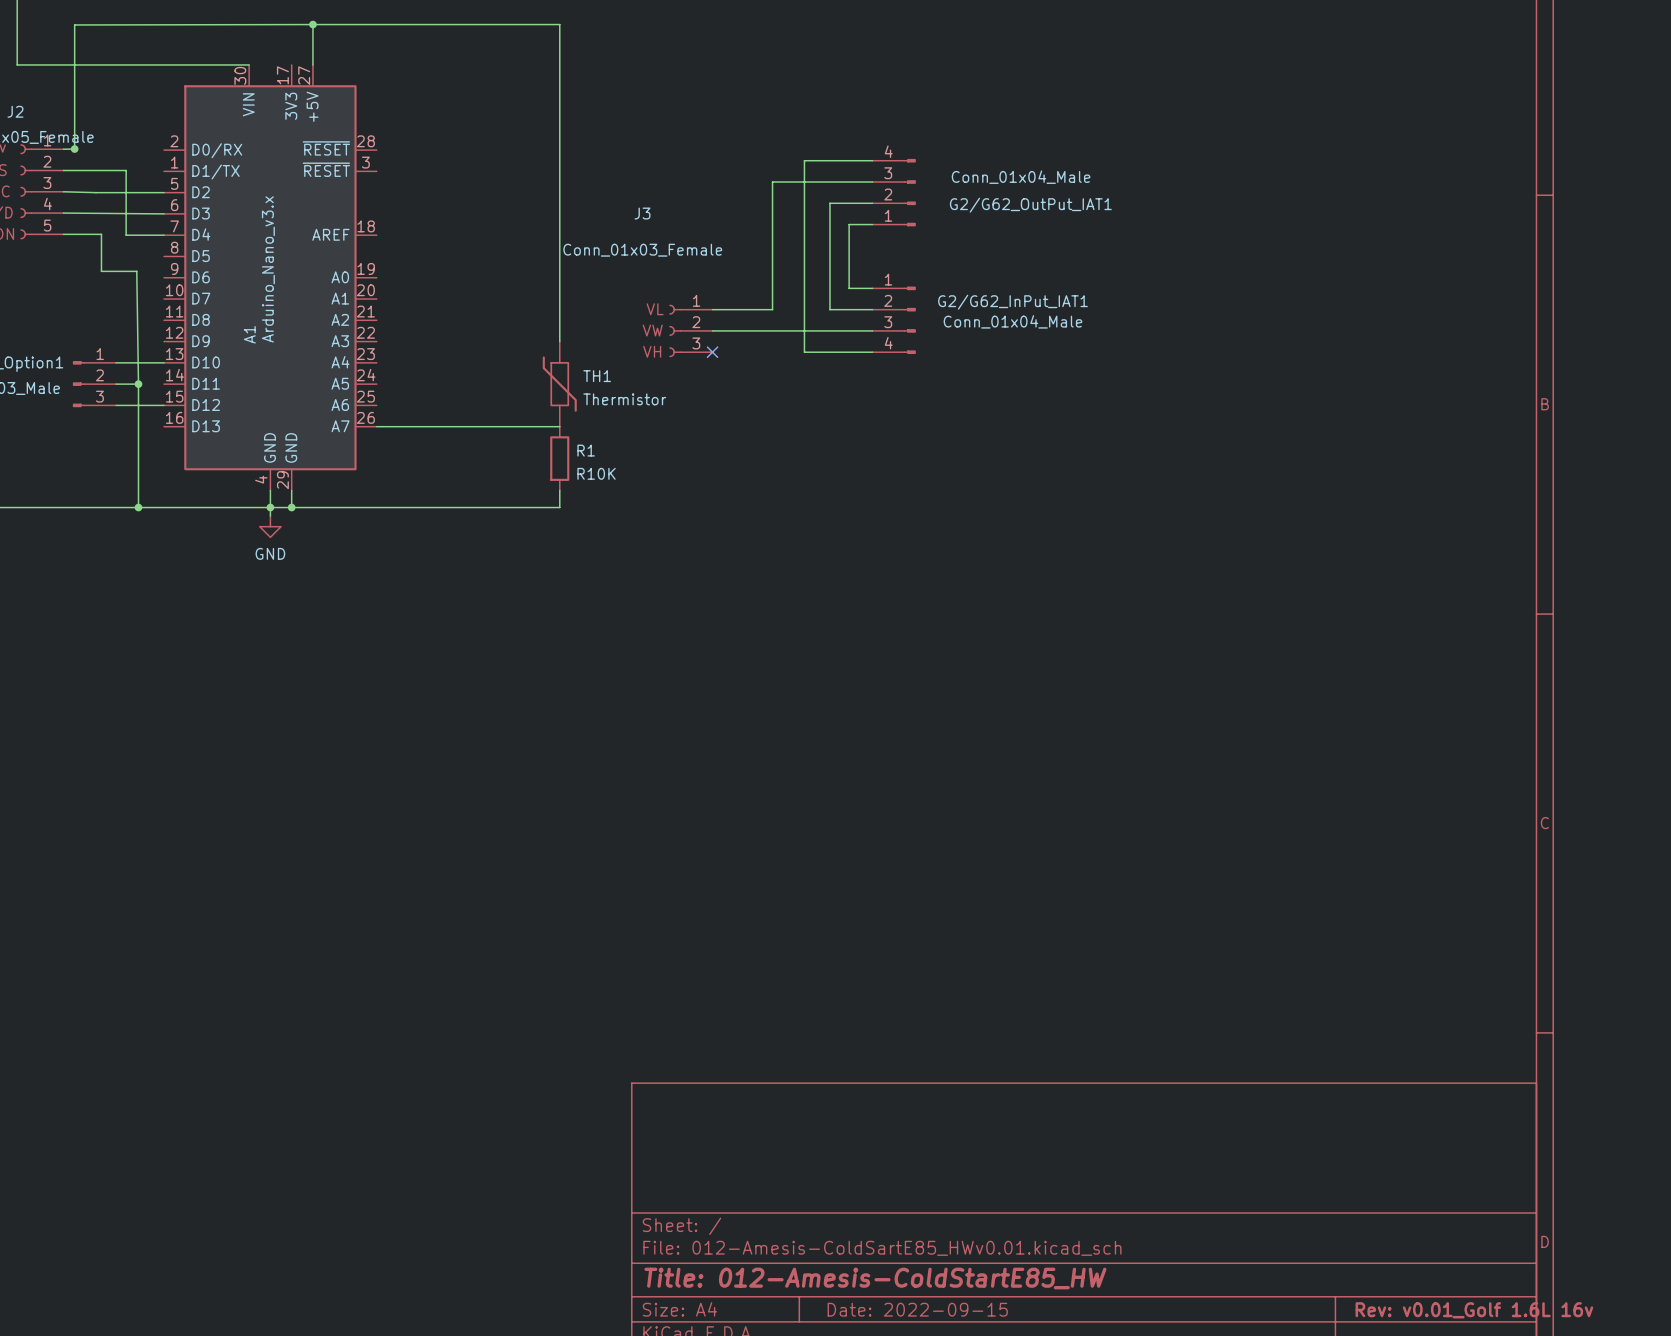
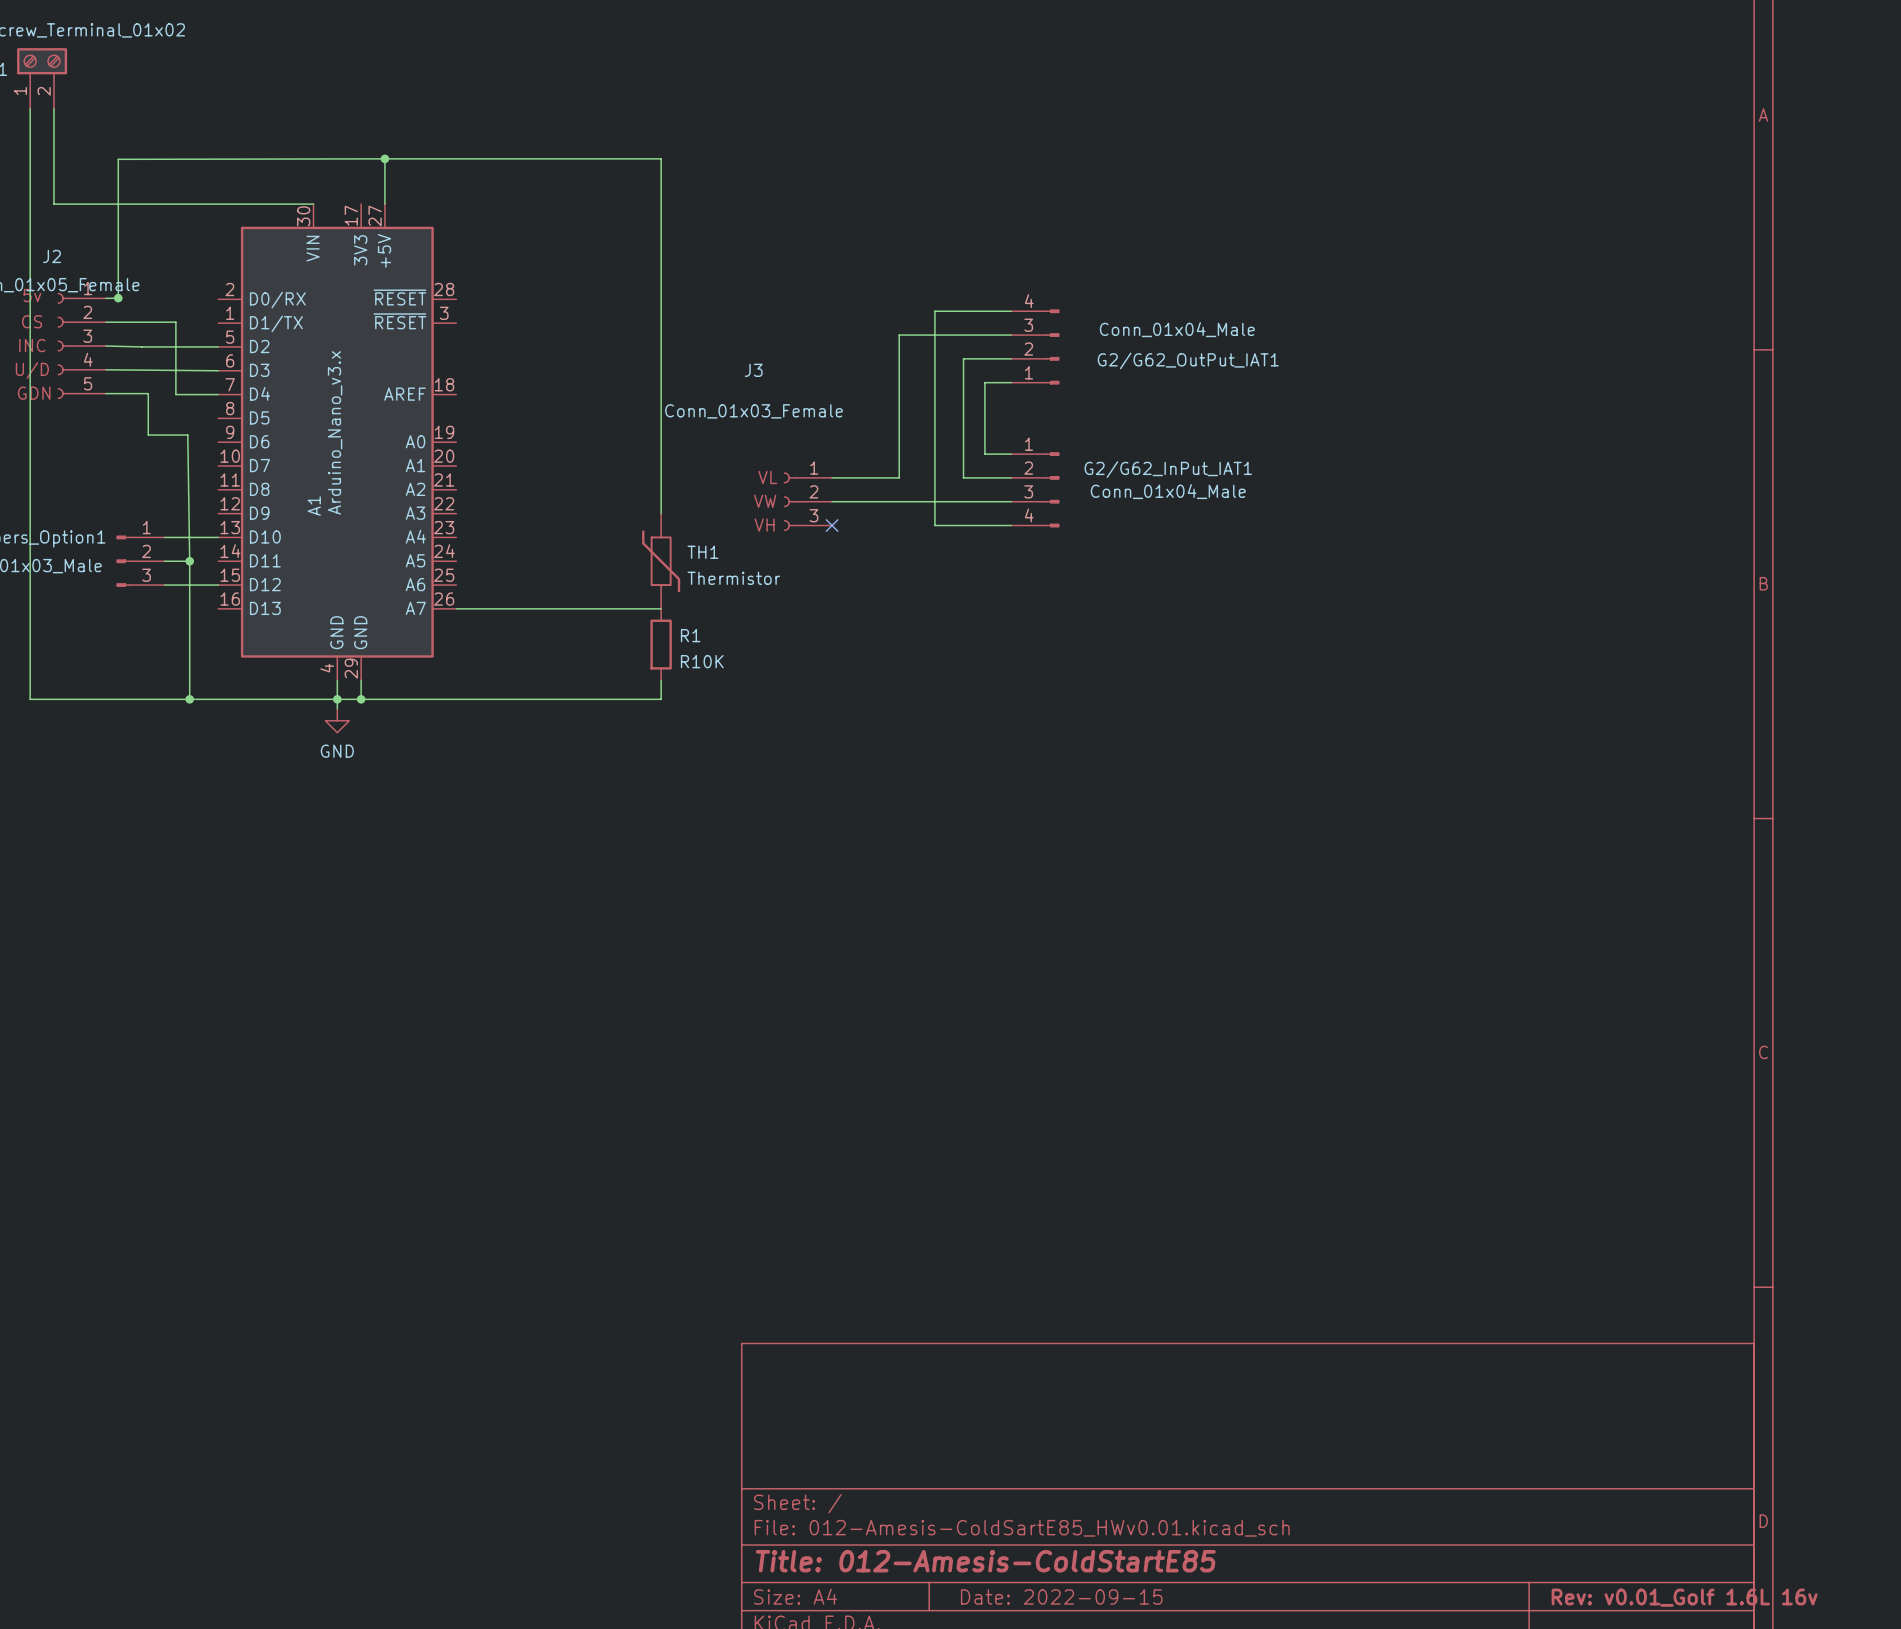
title block: Title: 012-Amesis-ColdStartE85_HW (875, 1278) -> Title: 012-Amesis-ColdStartE85 (985, 1561)

